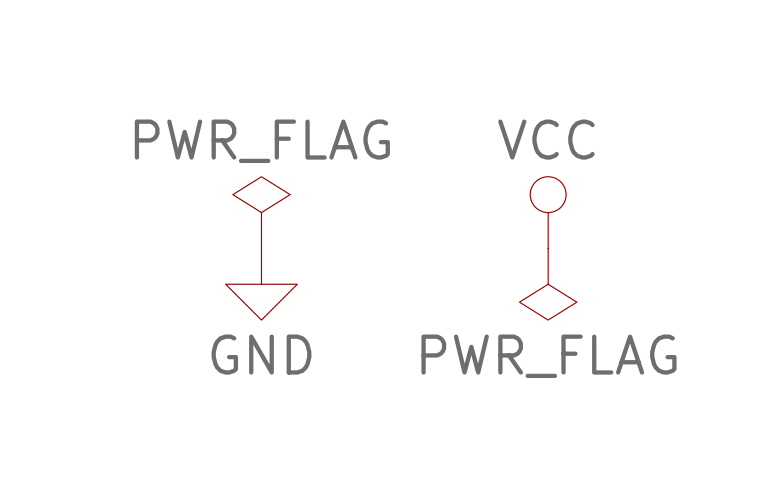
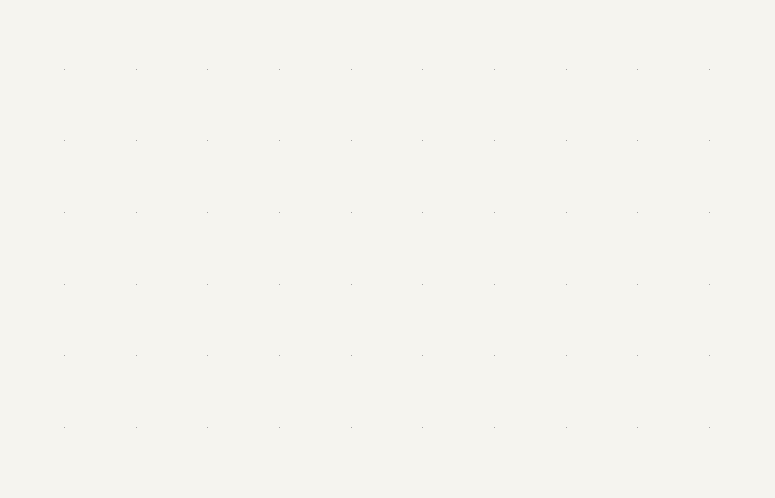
power symbol: PWR_FLAG (261, 212) -> none
power symbol: VCC (548, 212) -> none
power symbol: GND (261, 284) -> none
power symbol: PWR_FLAG (548, 284) -> none

